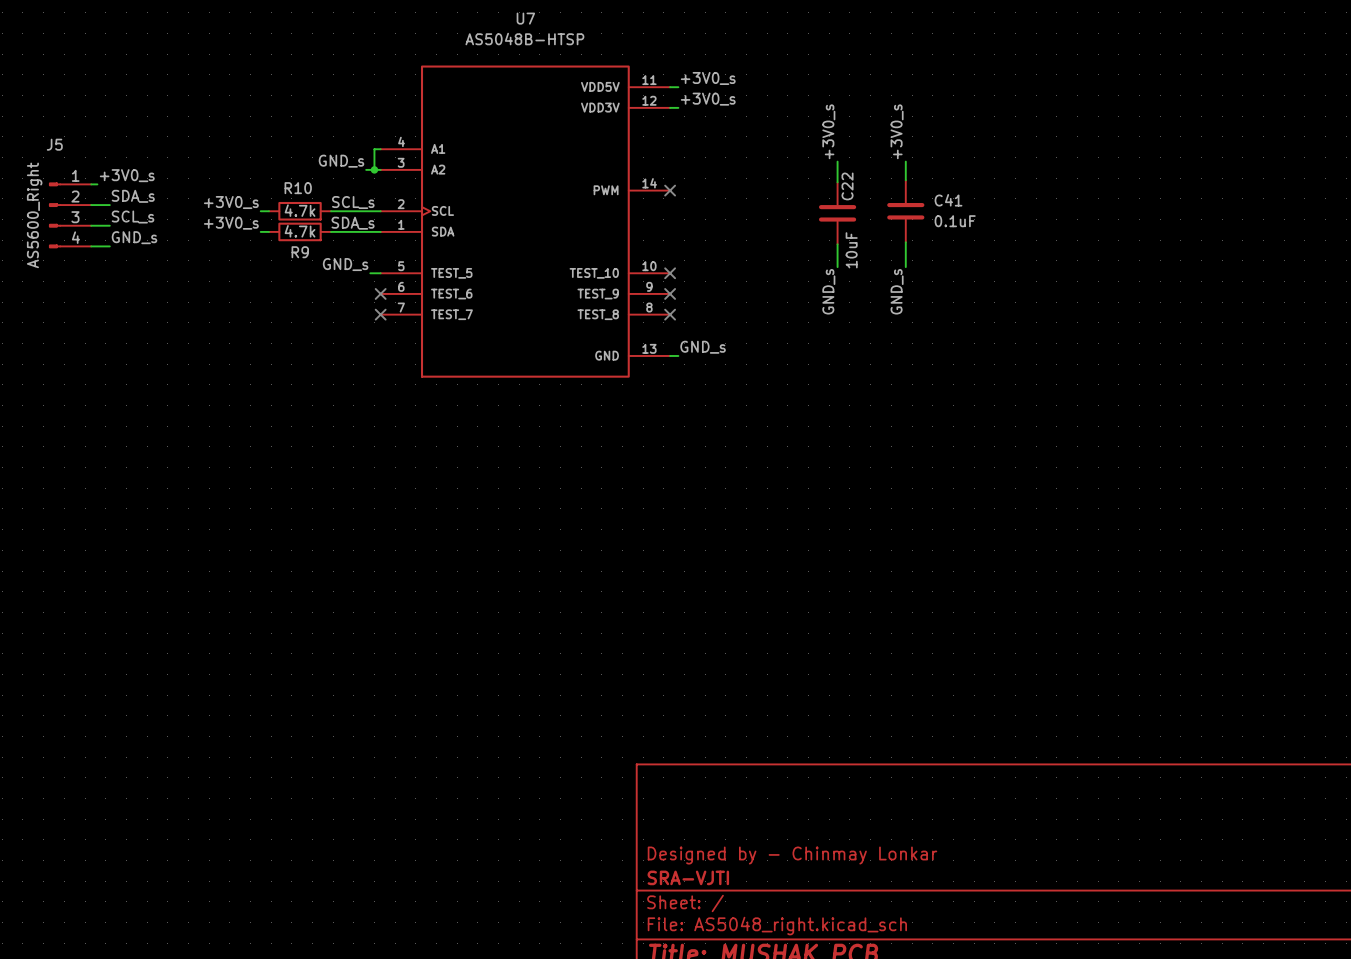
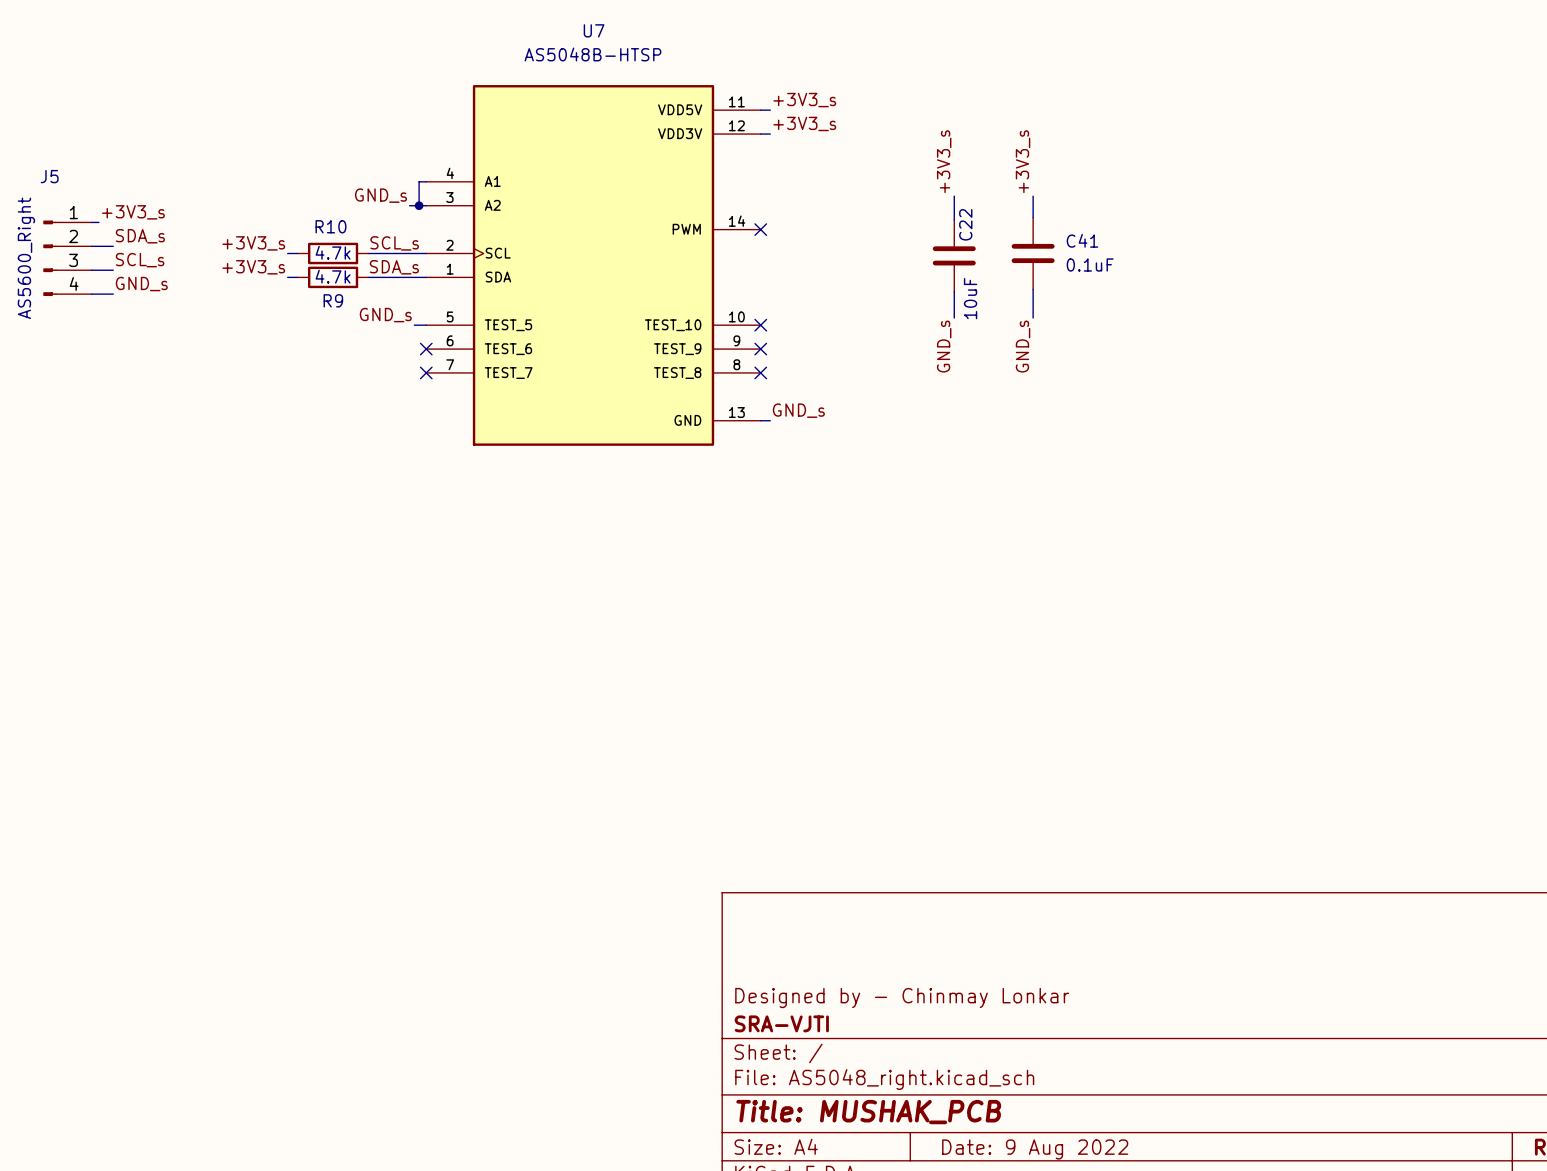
label: +3V0_s (708, 78) -> +3V3_s (804, 100)
label: +3V0_s (708, 99) -> +3V3_s (804, 123)
label: +3V0_s (828, 131) -> +3V3_s (944, 161)
label: +3V0_s (897, 131) -> +3V3_s (1023, 161)
label: +3V0_s (127, 175) -> +3V3_s (133, 212)
label: +3V0_s (231, 202) -> +3V3_s (253, 243)
label: +3V0_s (231, 223) -> +3V3_s (253, 267)

